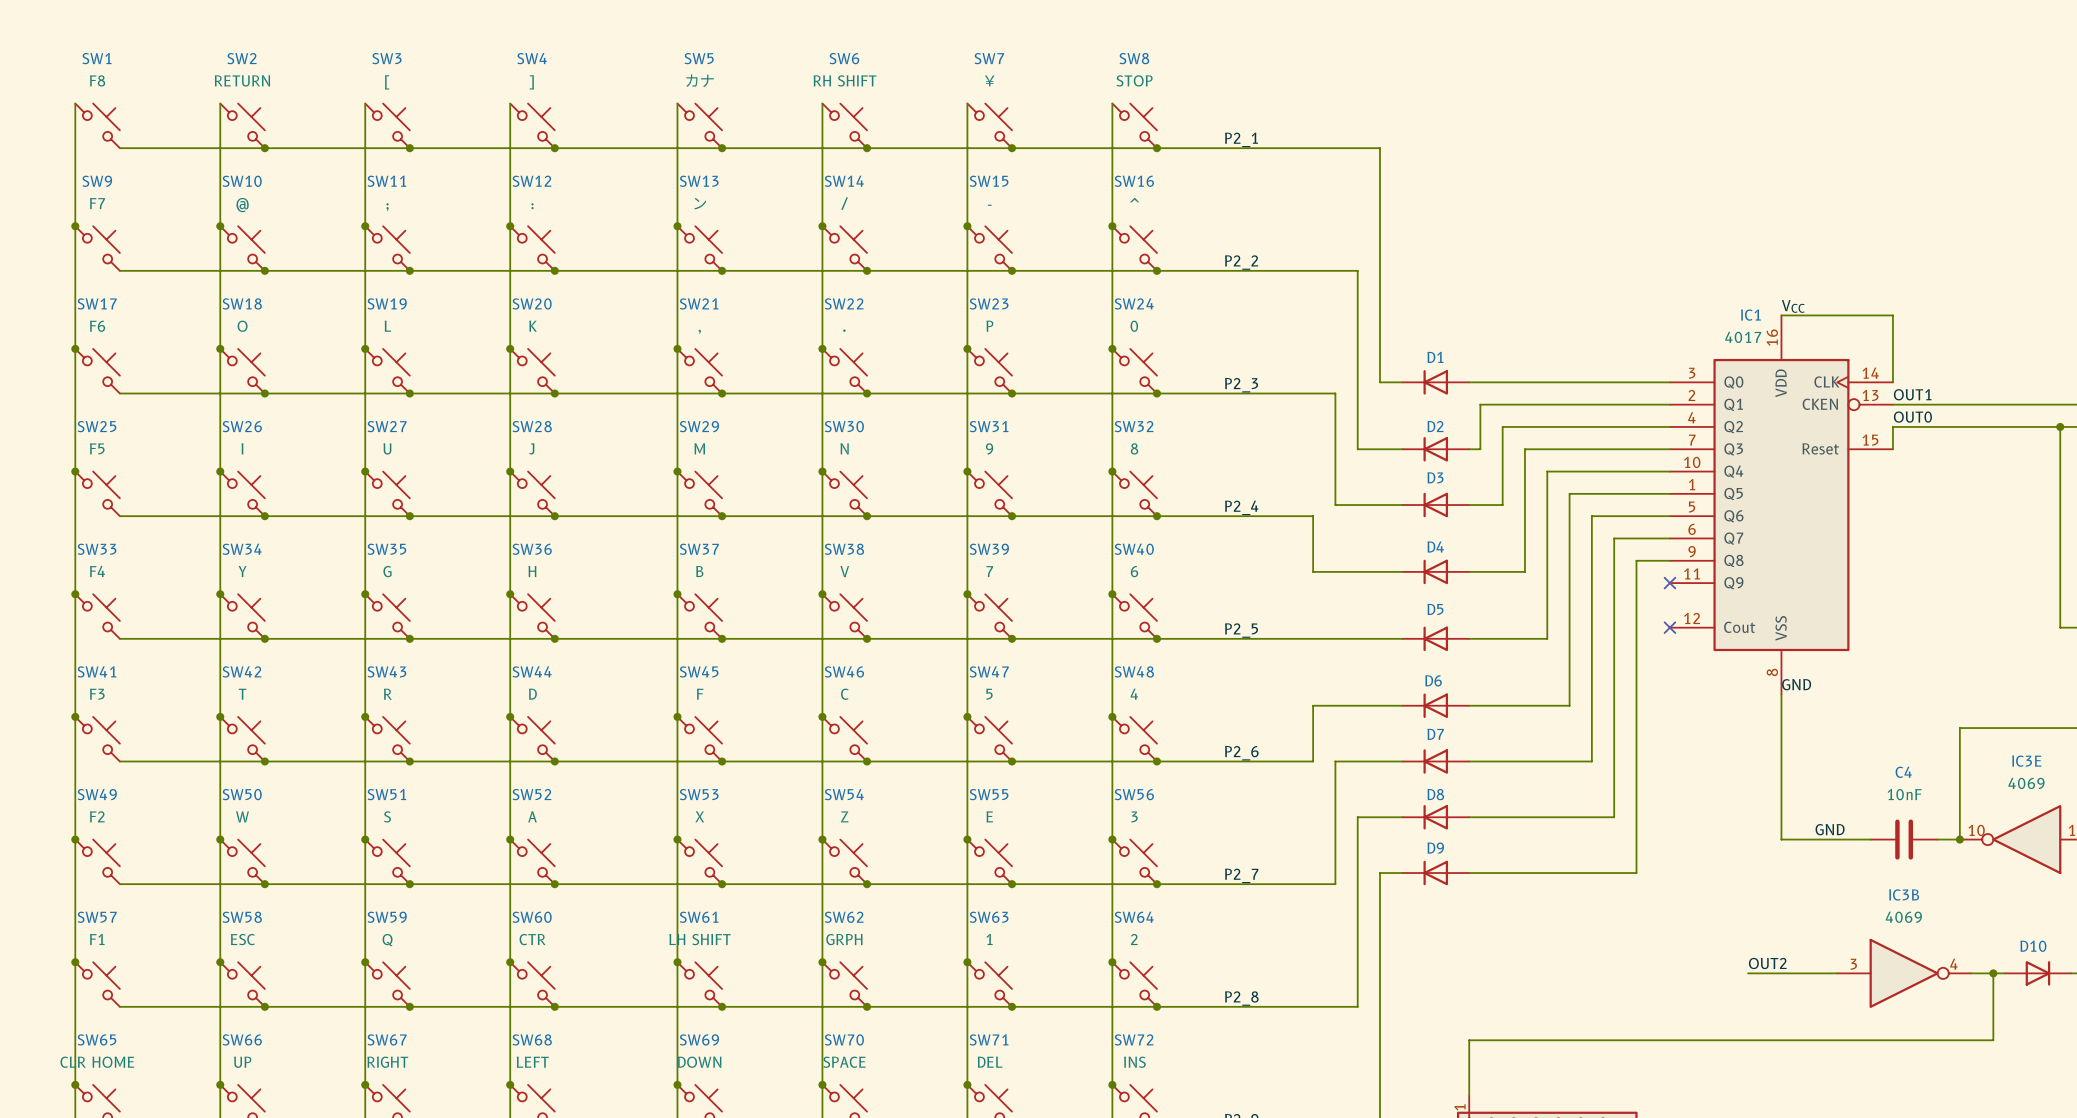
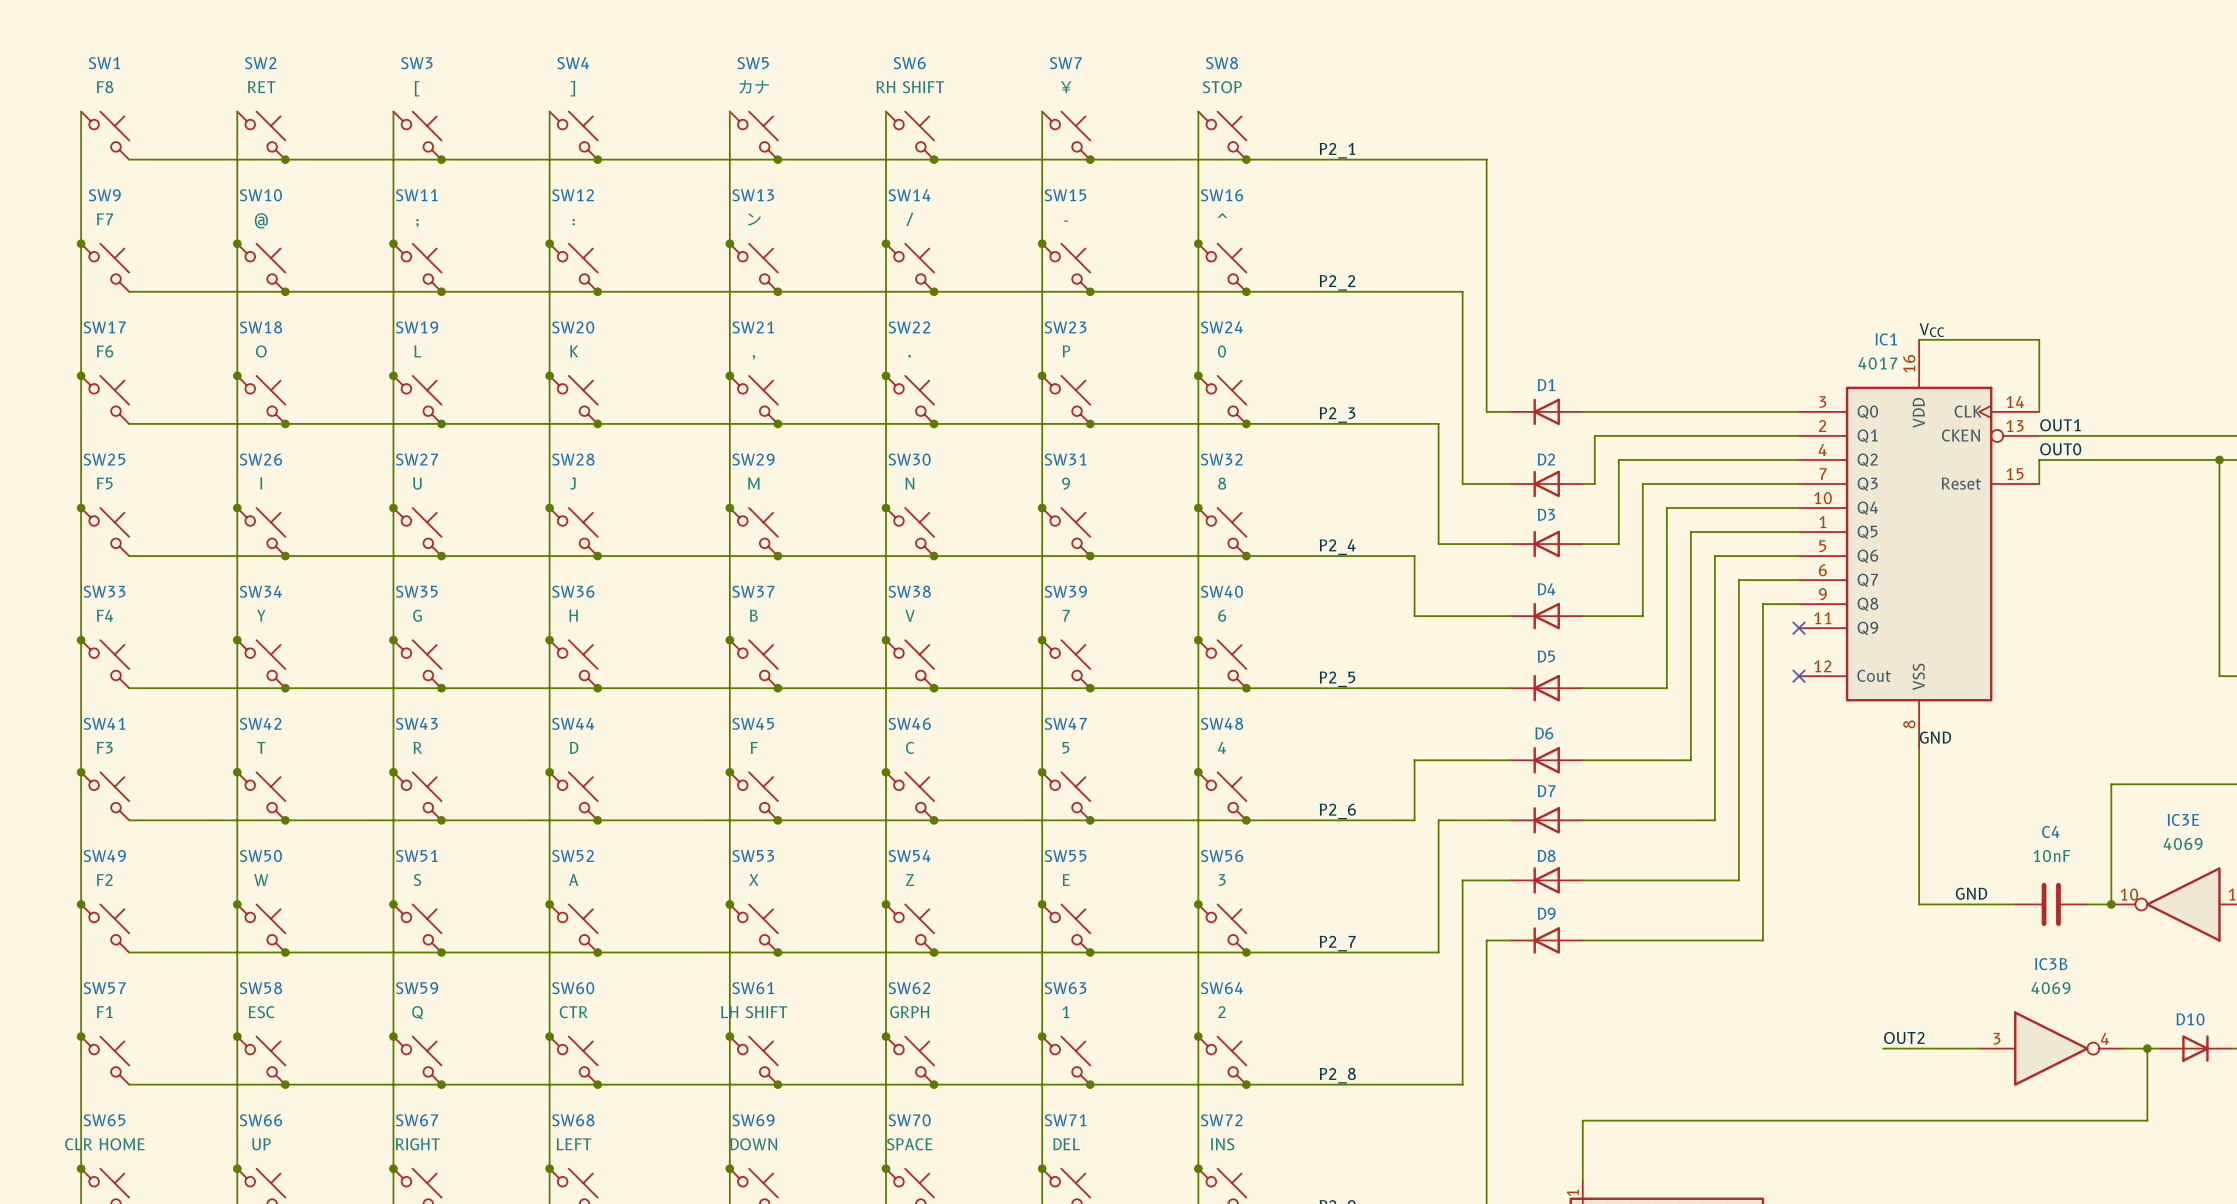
SW2 value: RETURN (242, 80) -> RET (261, 87)

